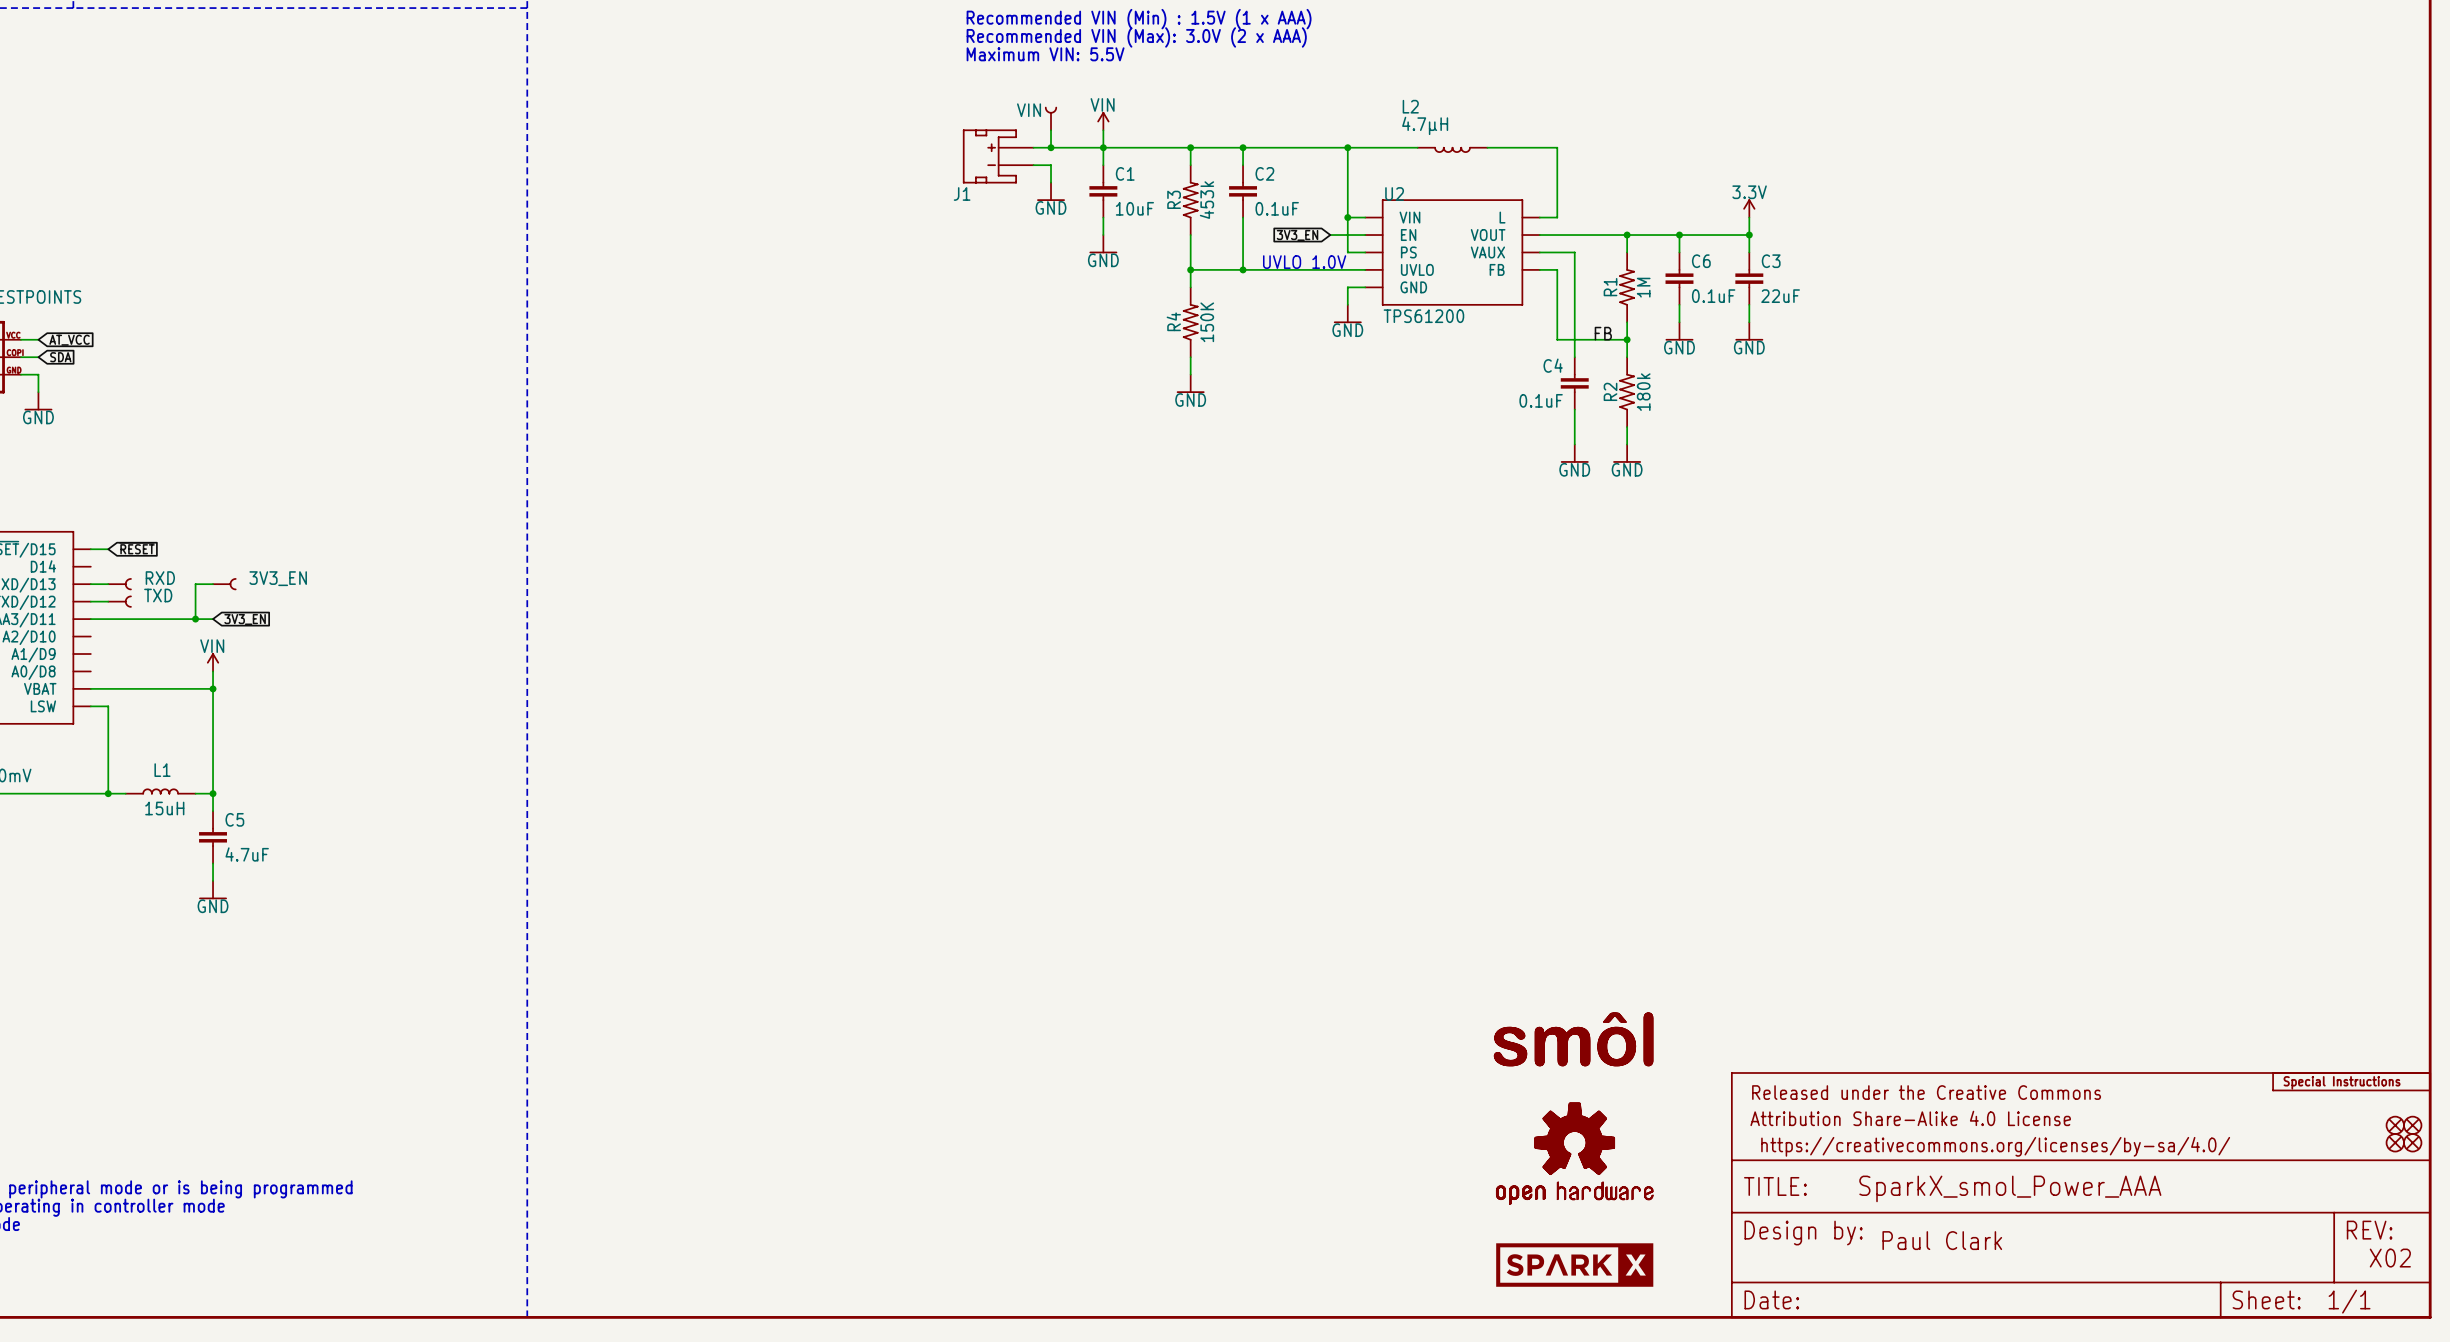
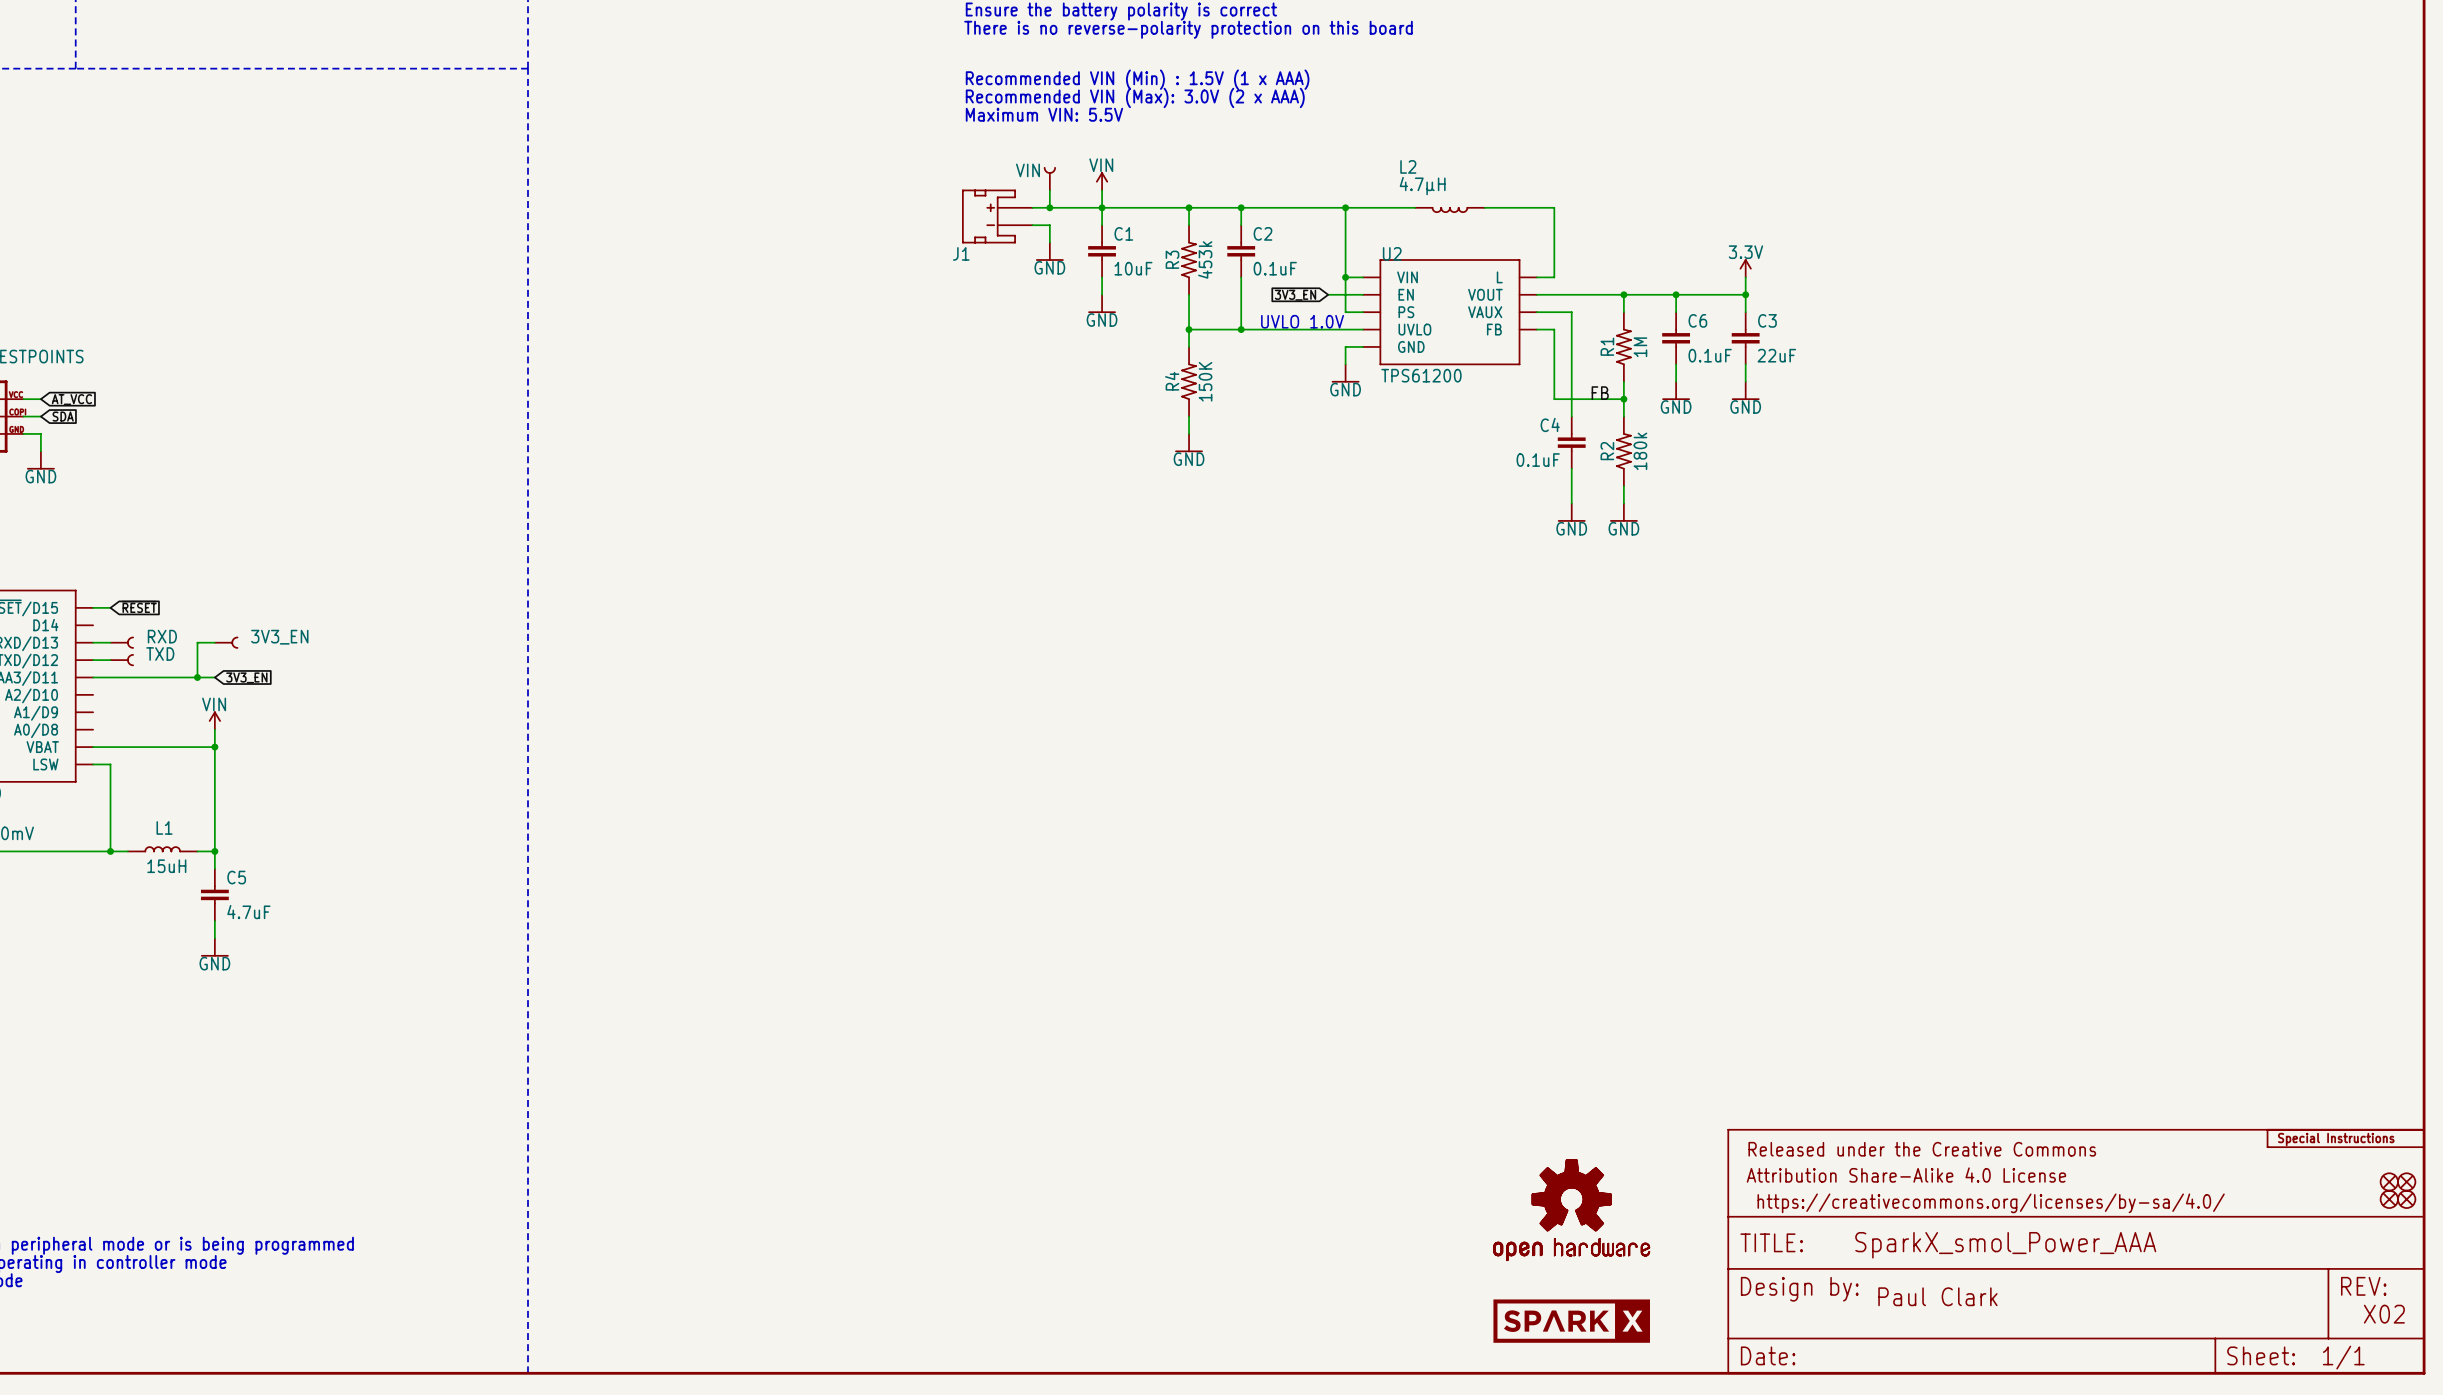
part: (1573, 1039) -> none

